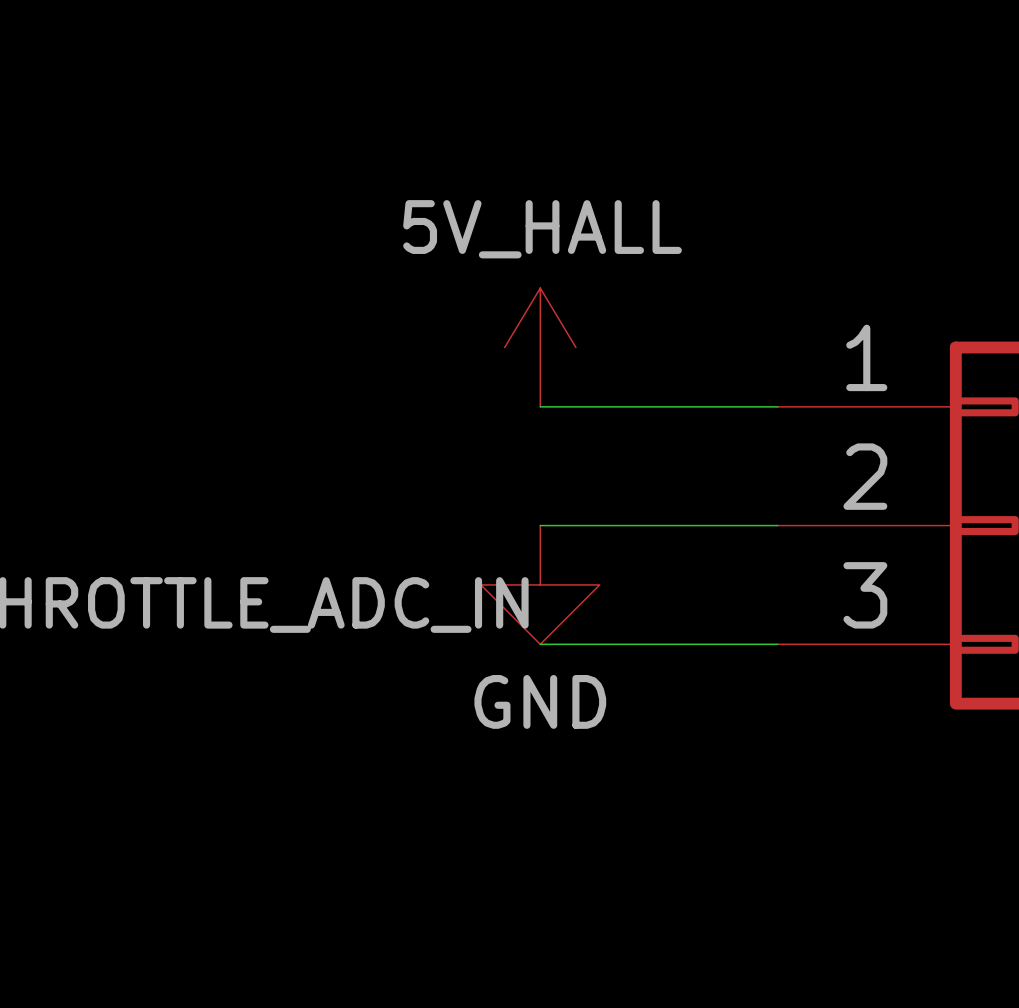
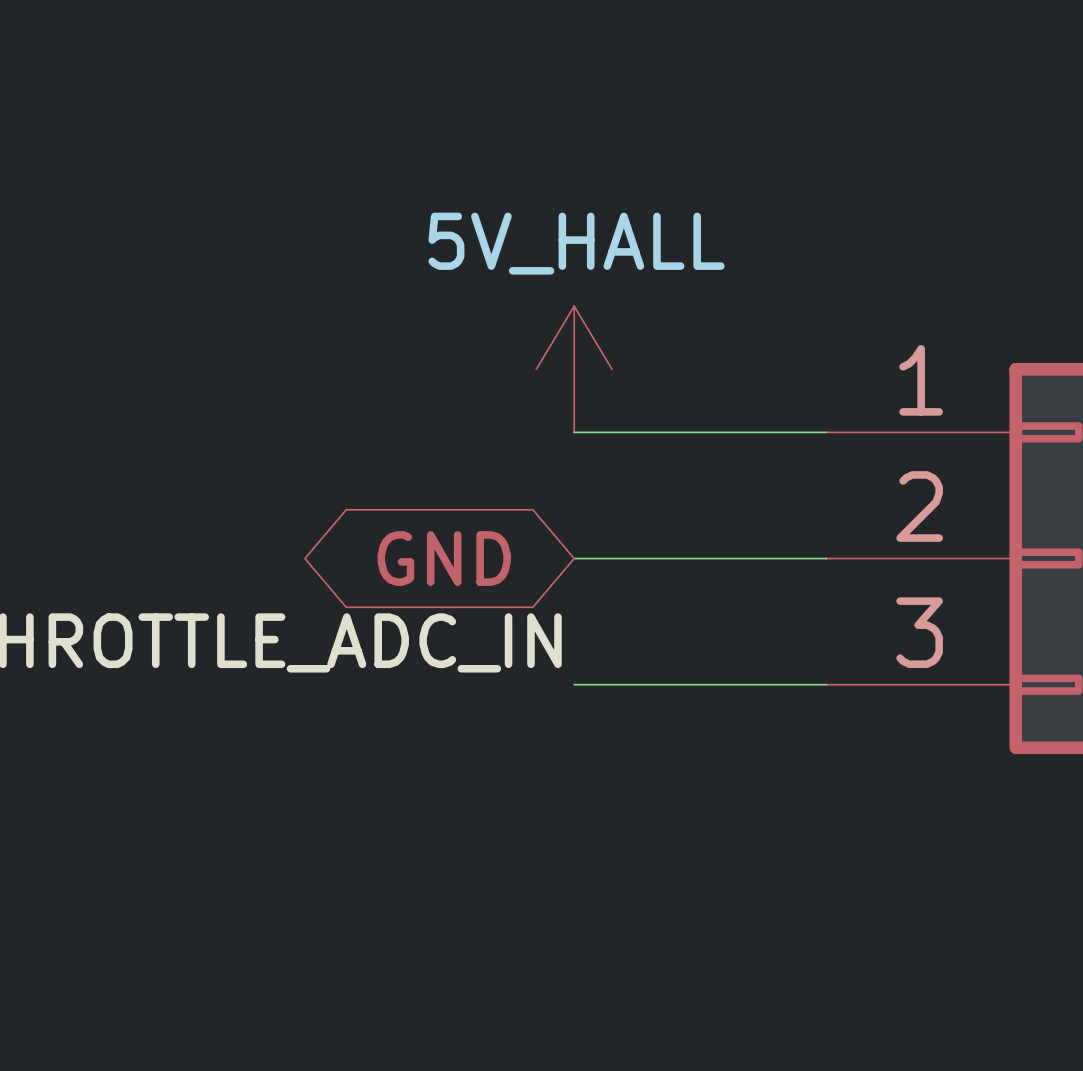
global label: none -> GND (444, 558)
power symbol: GND (540, 584) -> none

